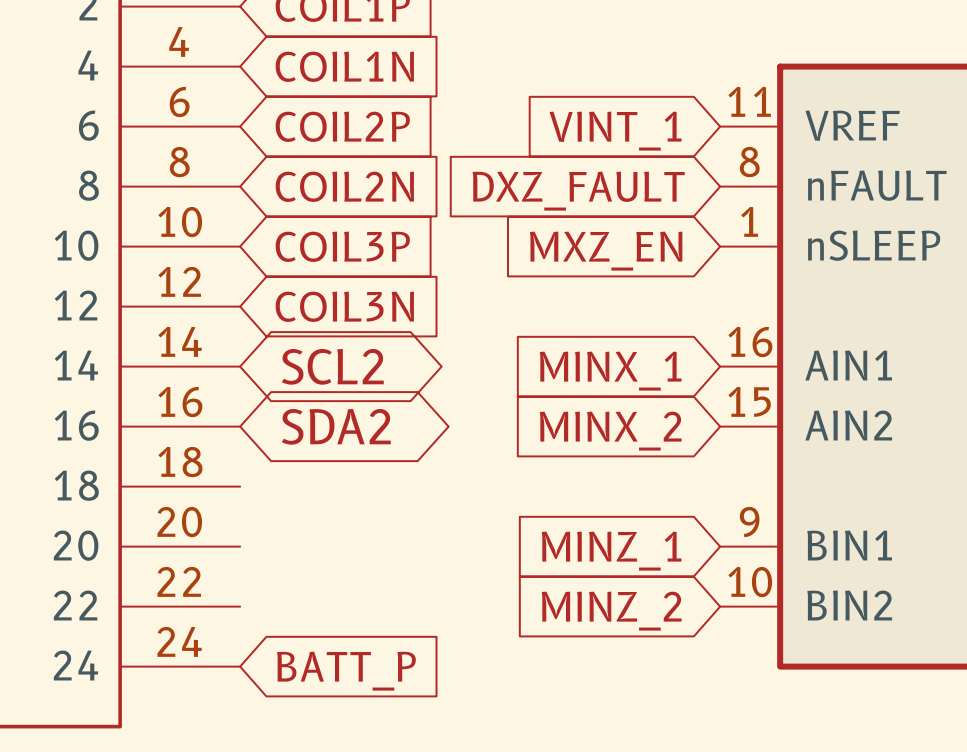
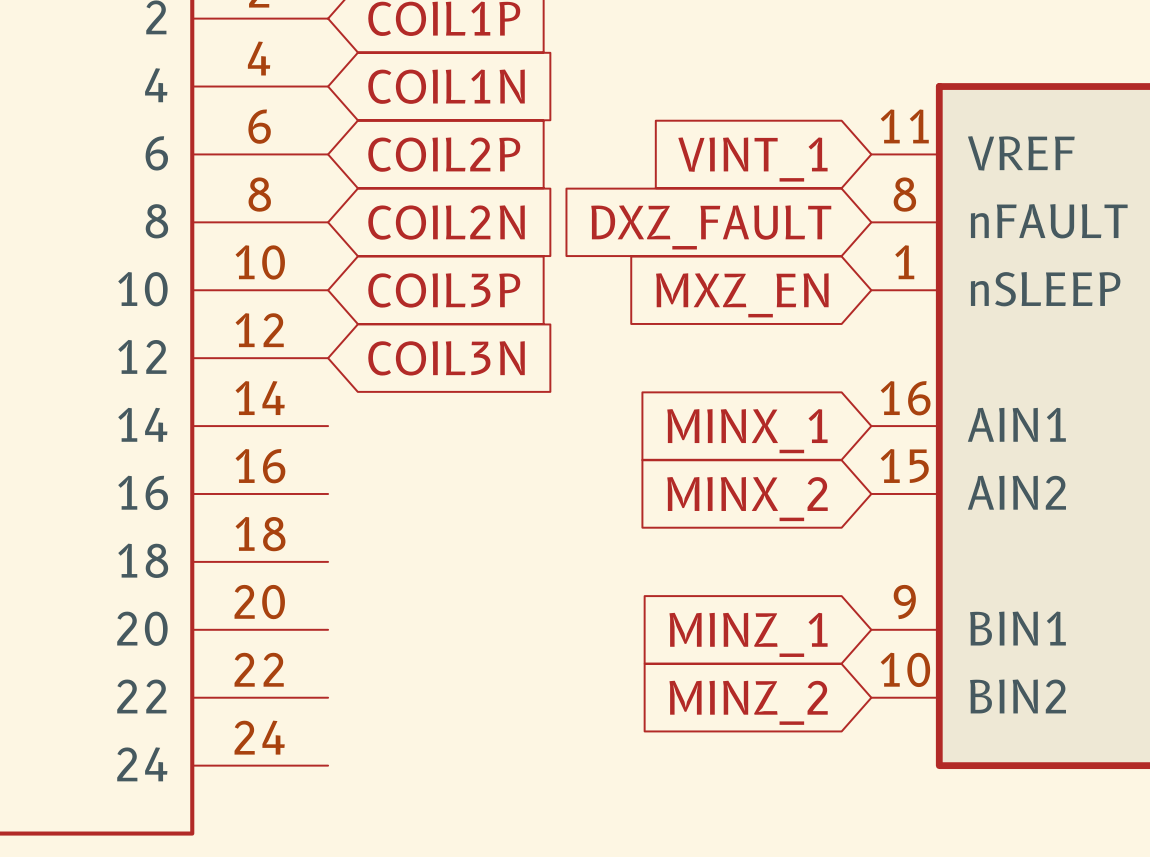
global label: SCL2 (332, 366) -> none
global label: SDA2 (336, 426) -> none
global label: BATT_P (346, 671) -> none

